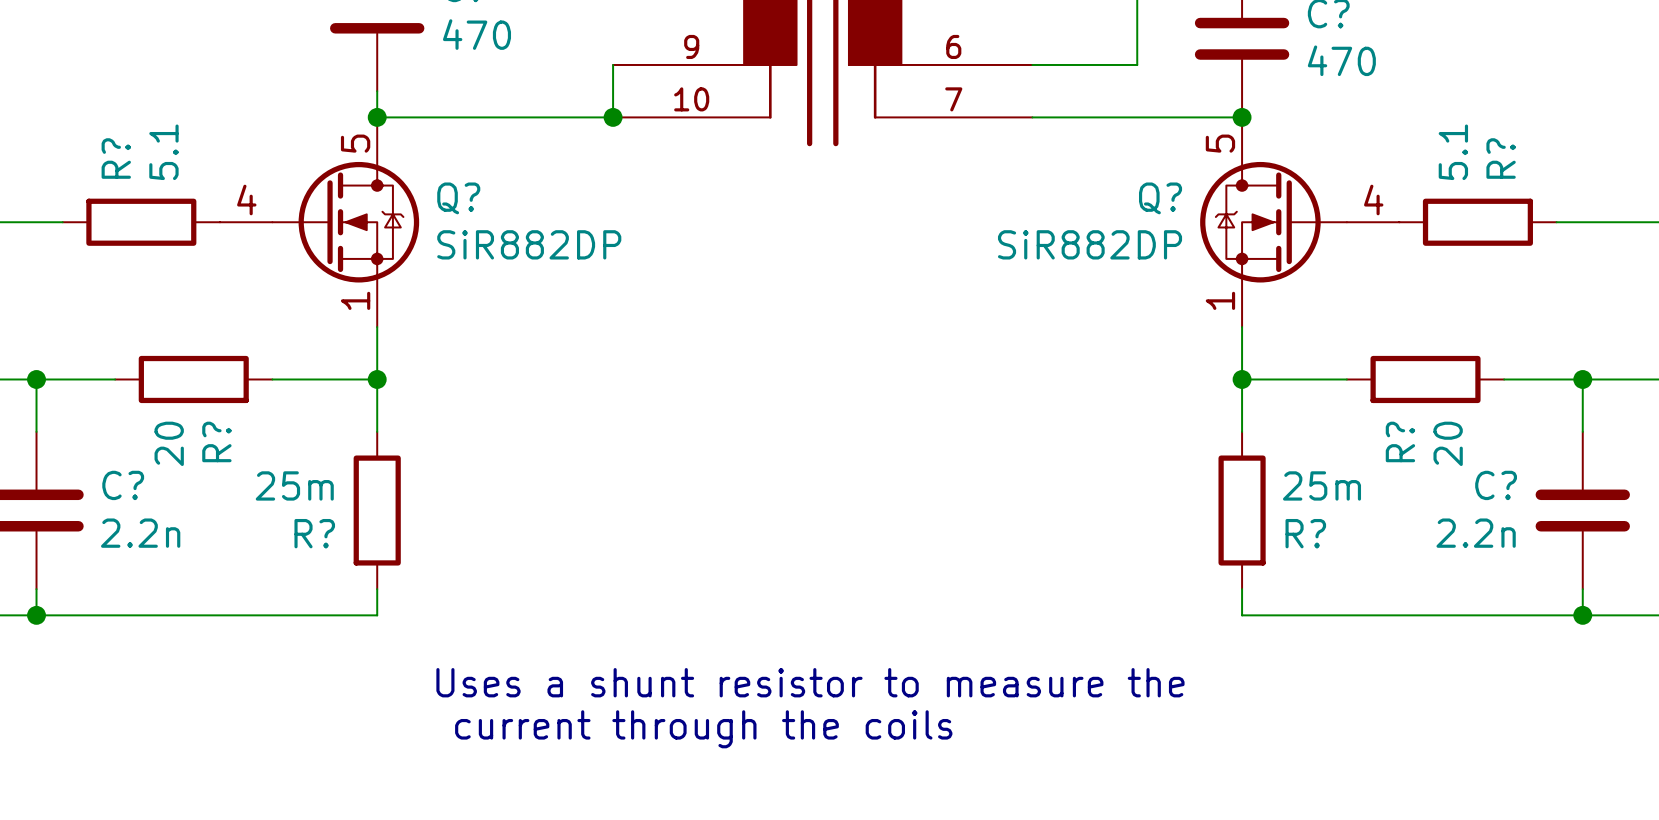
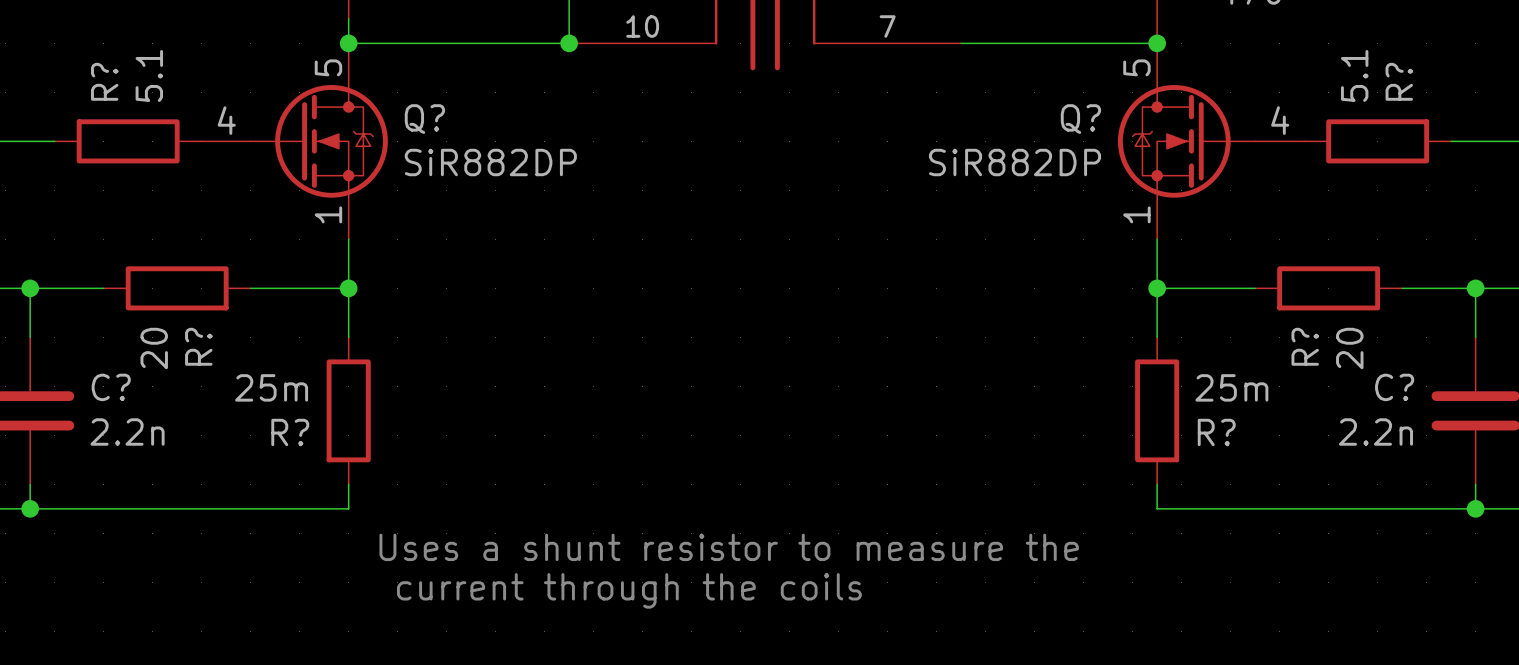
text position: Uses a shunt resistor to measure the (810, 682) -> Uses a shunt resistor to measure the (729, 547)
text position: current through the coils (703, 729) -> current through the coils (629, 590)

